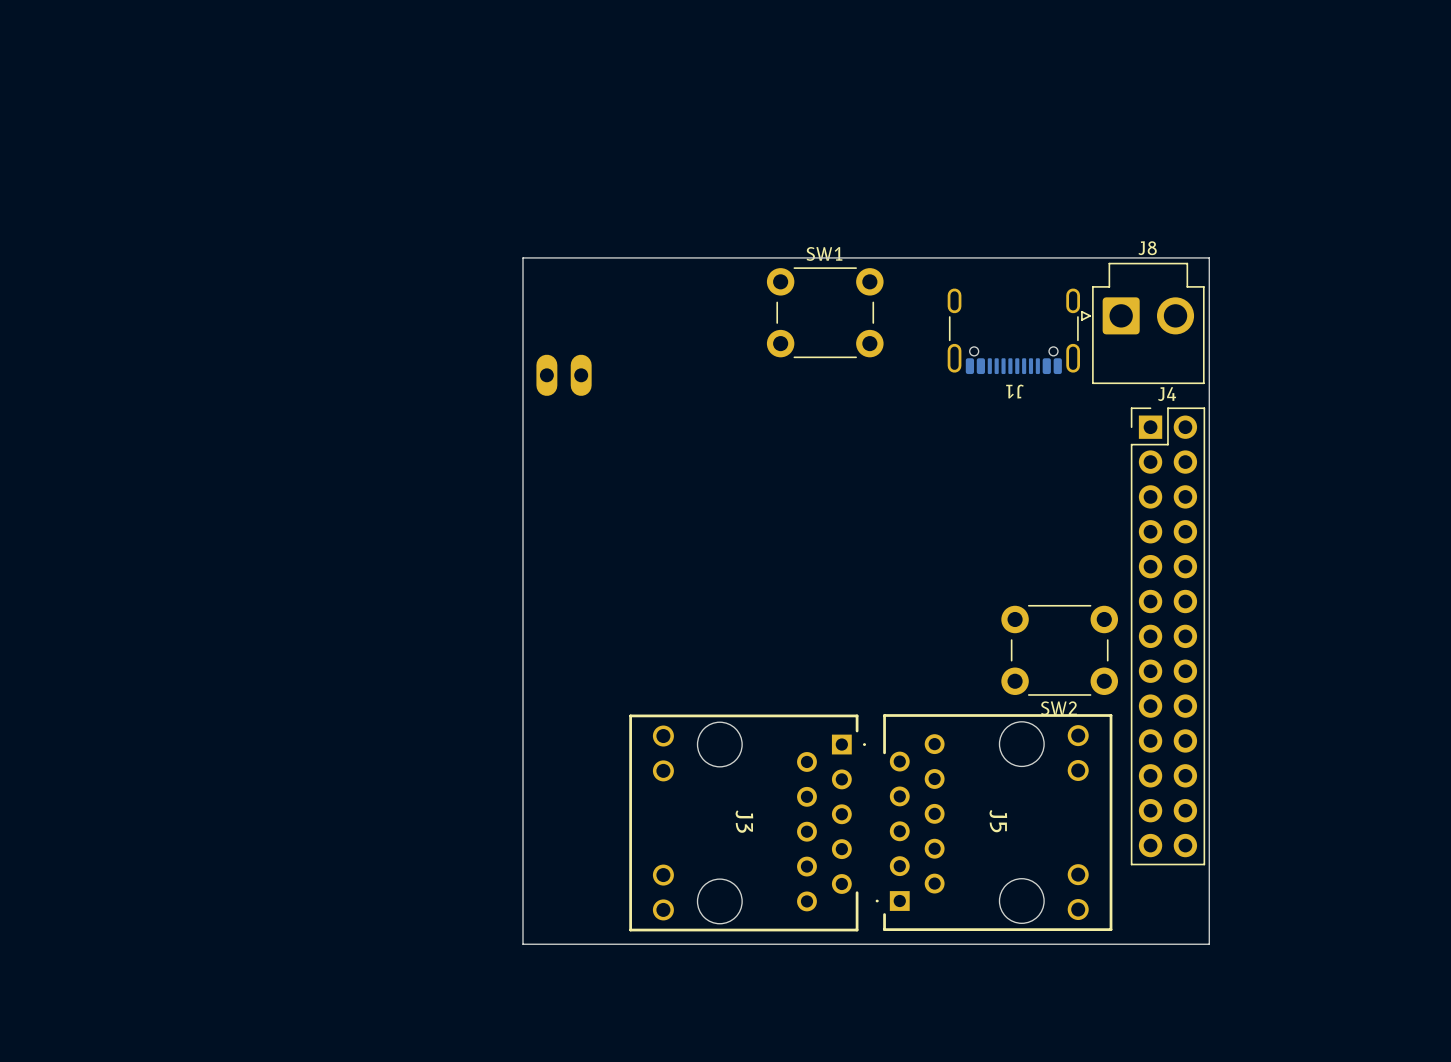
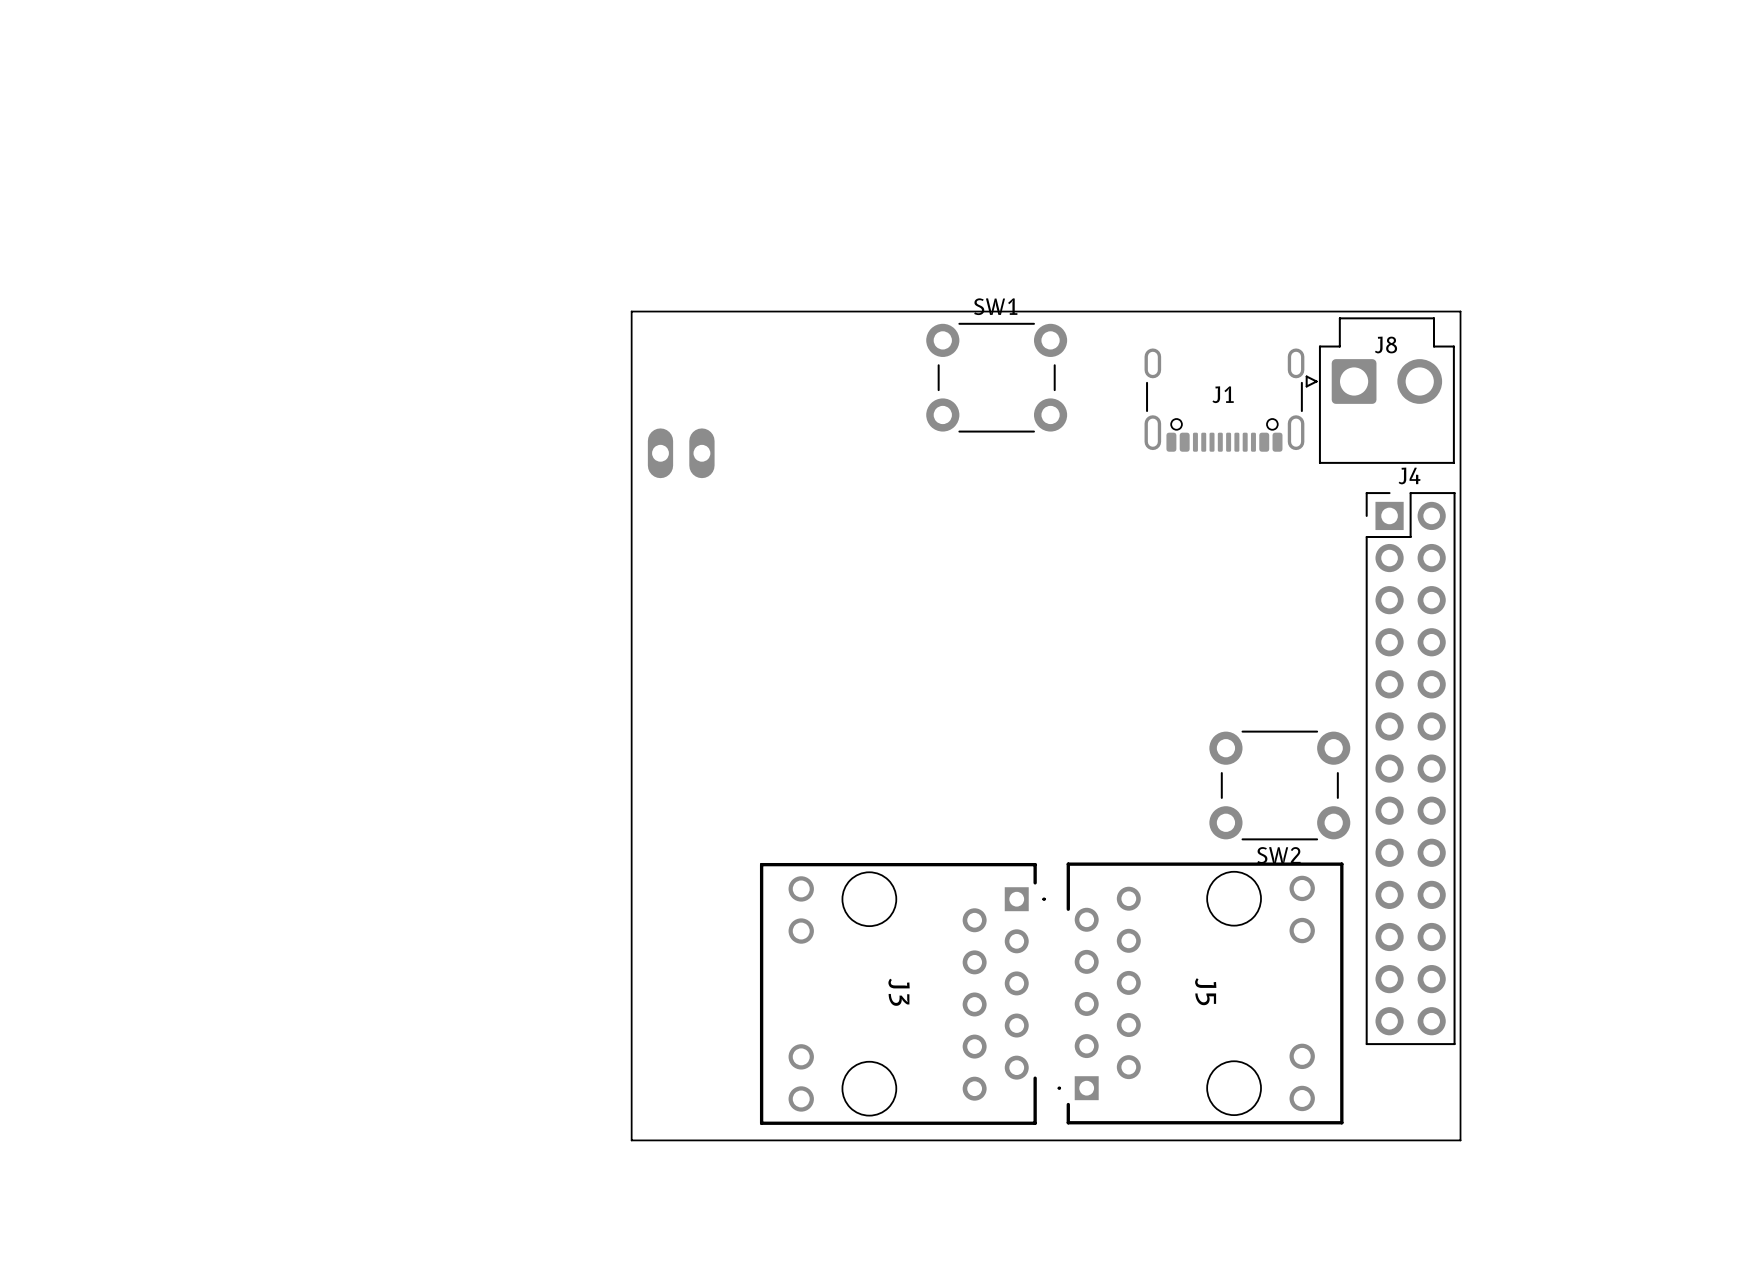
J8 name position: J8 (1147, 248) -> J8 (1385, 345)
J1 name rotation: 0° (1014, 391) -> 180° (1223, 394)
J1 name position: J1 (1014, 391) -> J1 (1223, 394)

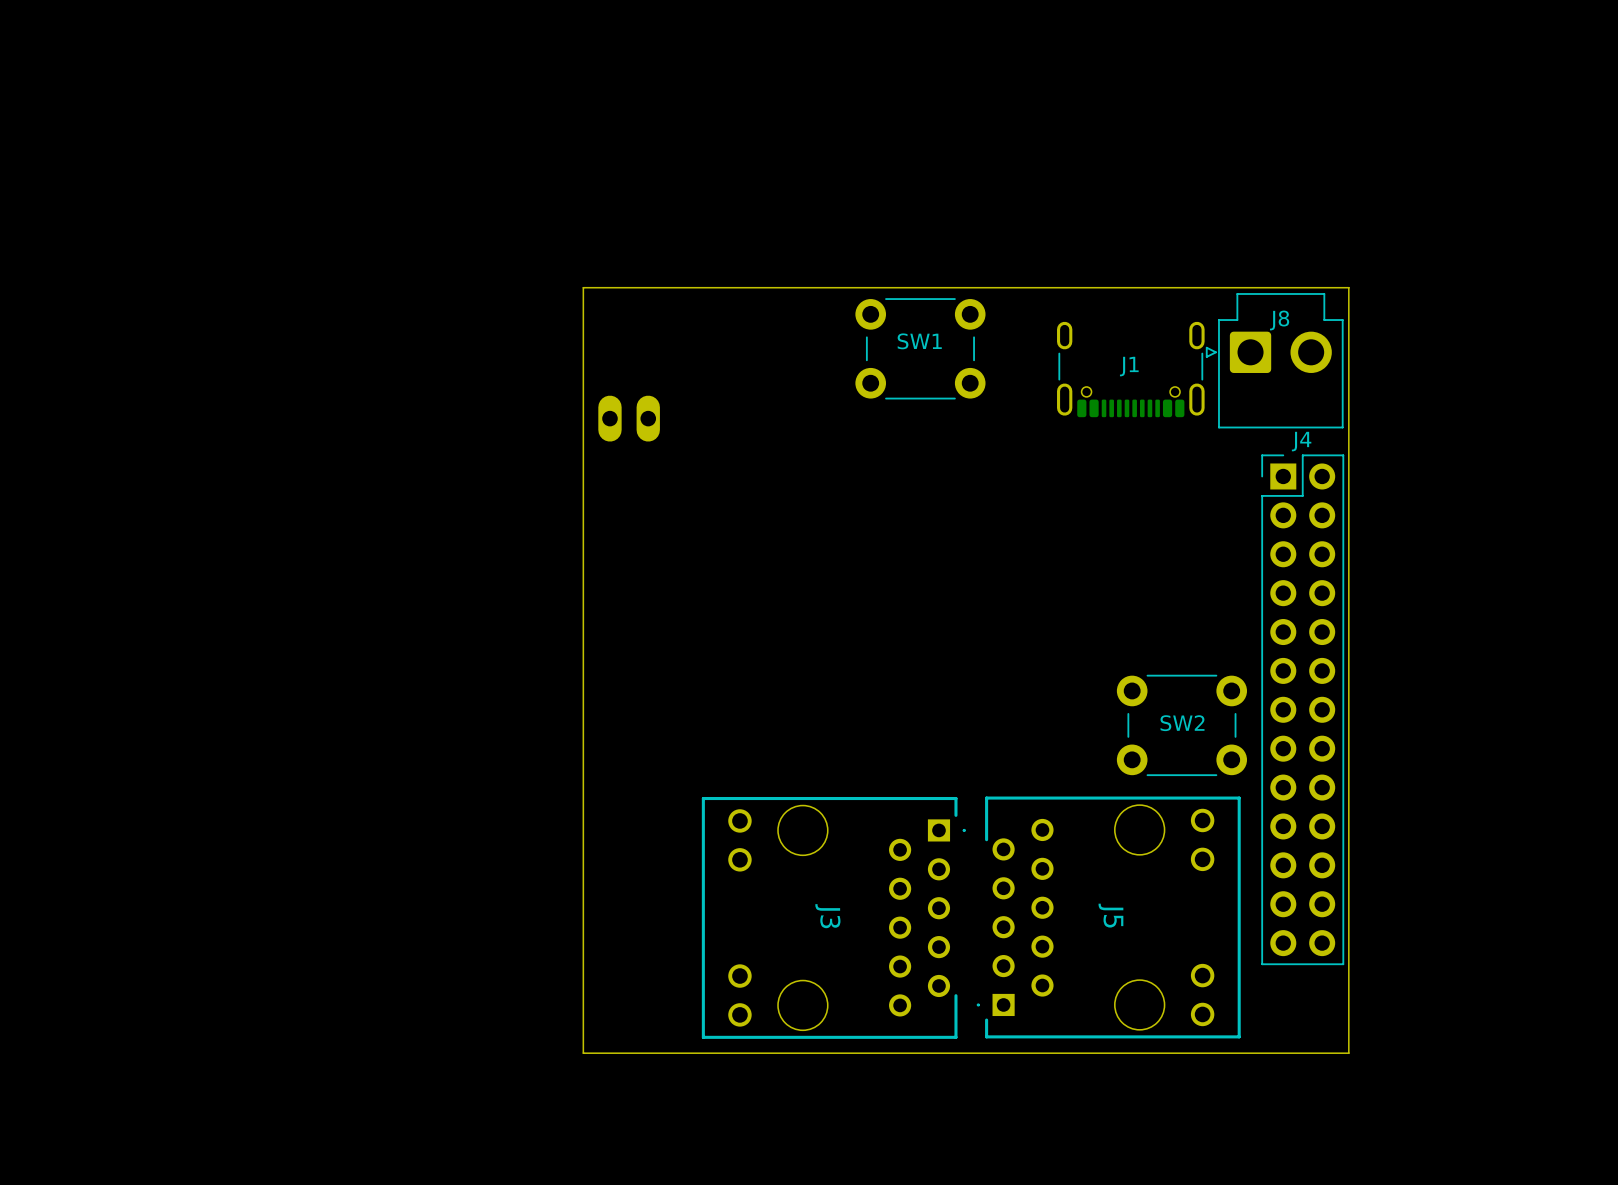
SW1 name position: SW1 (995, 306) -> SW1 (919, 341)
SW2 name position: SW2 (1278, 855) -> SW2 (1182, 723)

